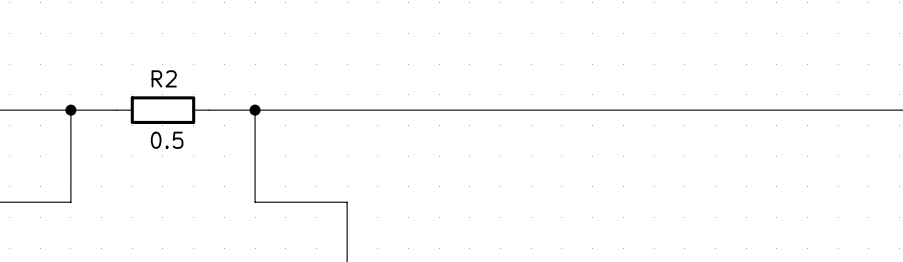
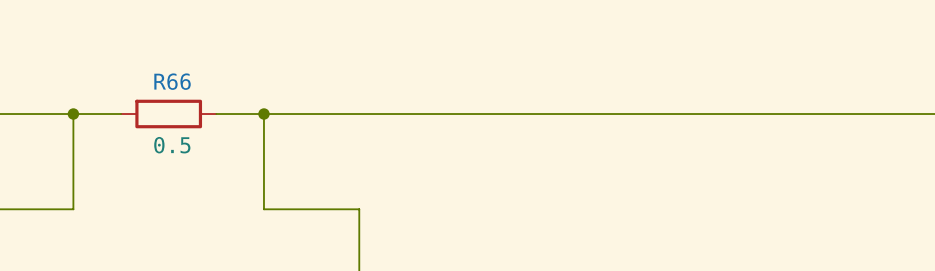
R2 name: R2 (164, 78) -> R66 (172, 81)

